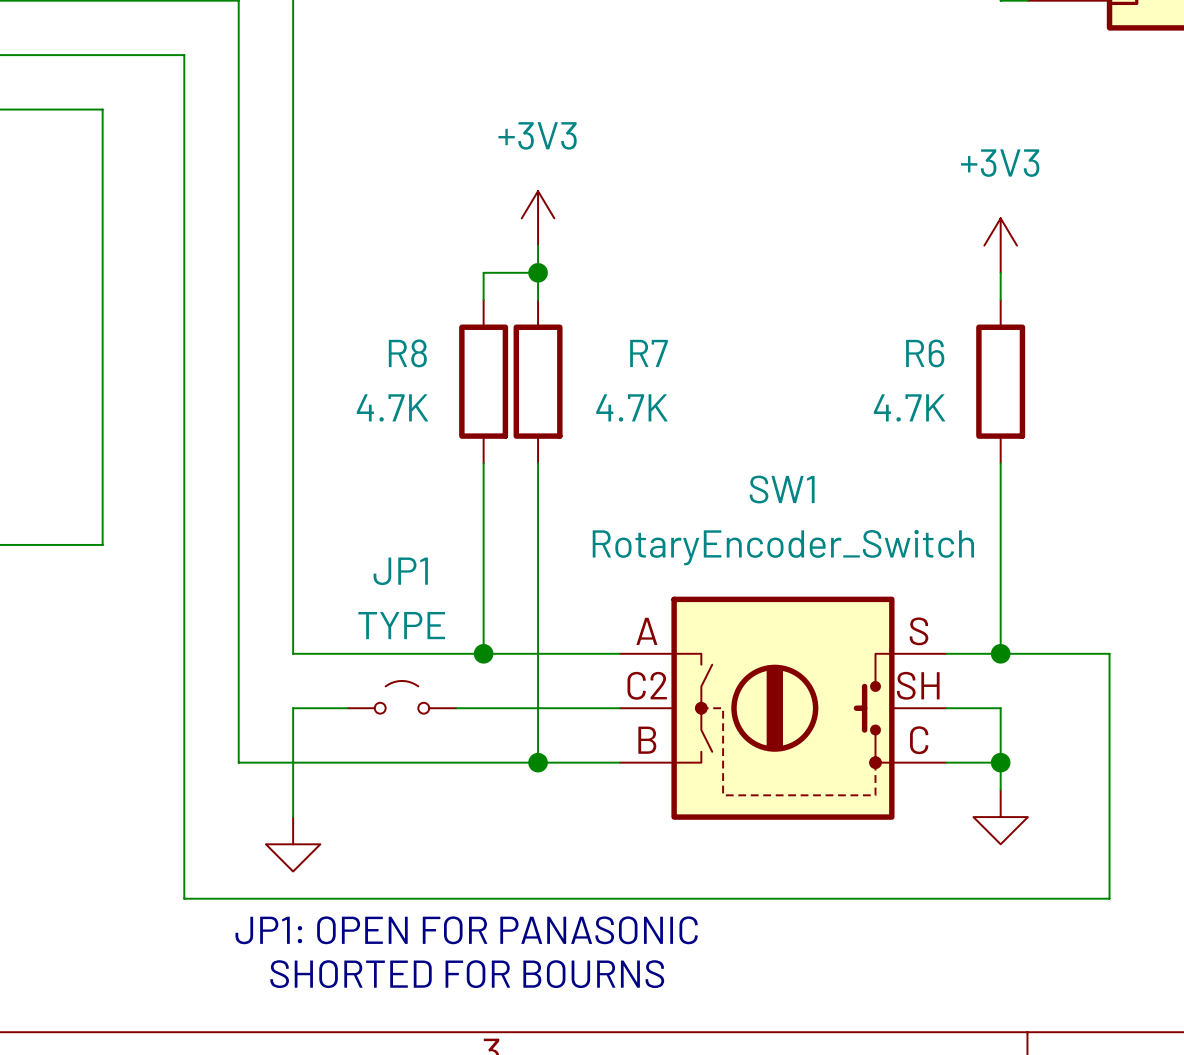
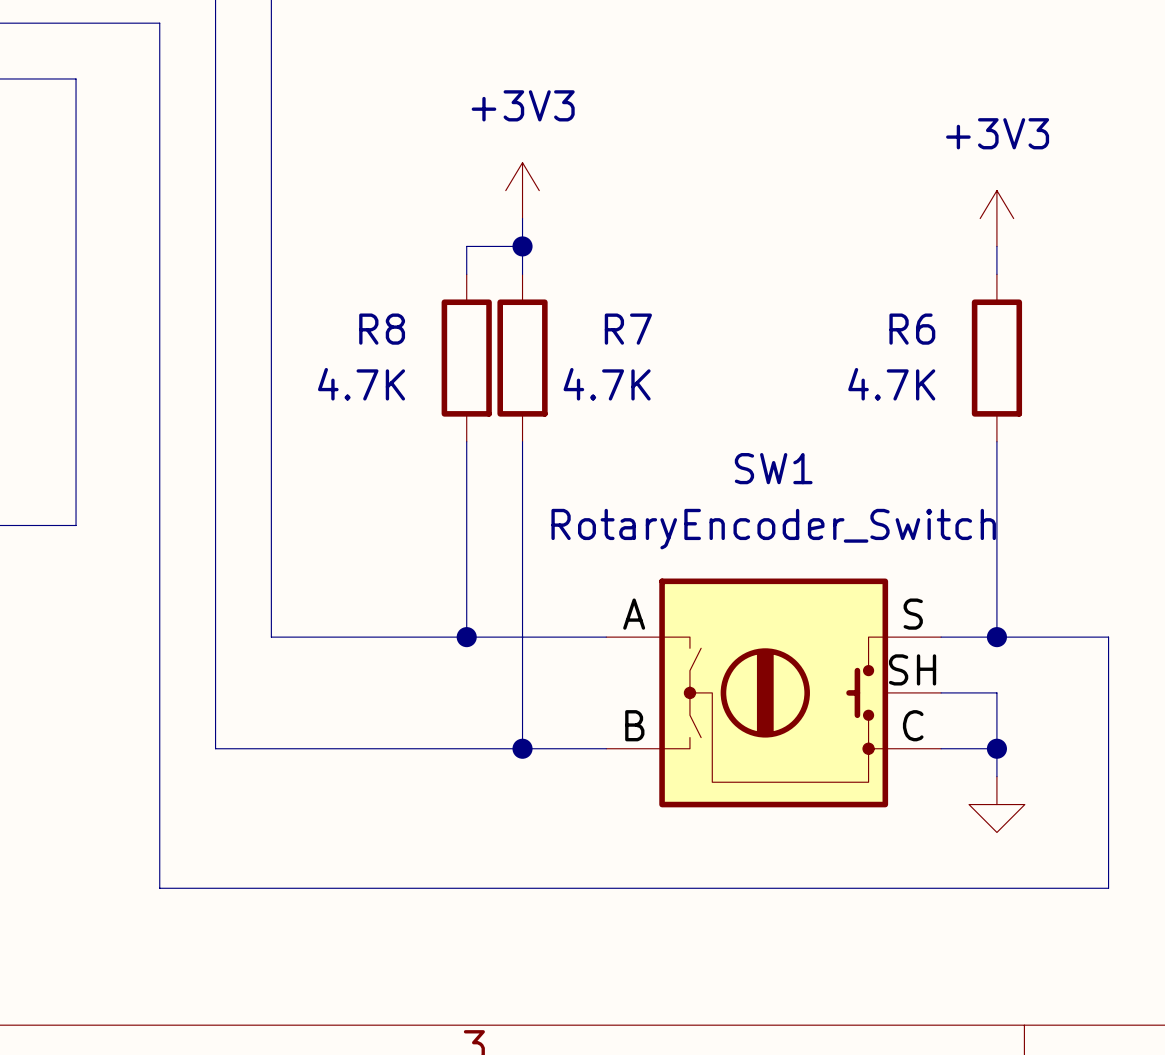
SW1 symbol: [619, 596, 947, 820] -> [606, 578, 942, 808]
JP1: TYPE (401, 697) -> none
wire: (347, 708) (293, 708) (293, 817) -> none
wire: (456, 708) (619, 708) -> none
power symbol: (293, 844) -> none
text: JP1: OPEN FOR PANASONIC (466, 930) -> none
text: SHORTED FOR BOURNS (467, 974) -> none

